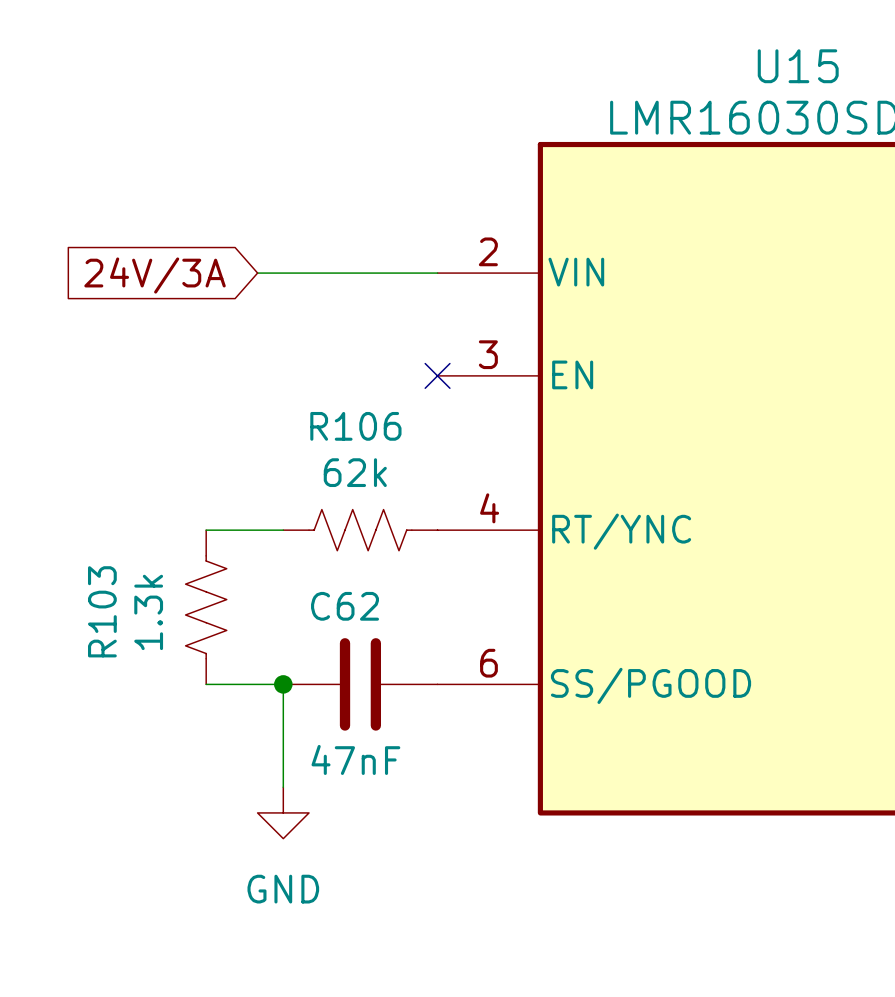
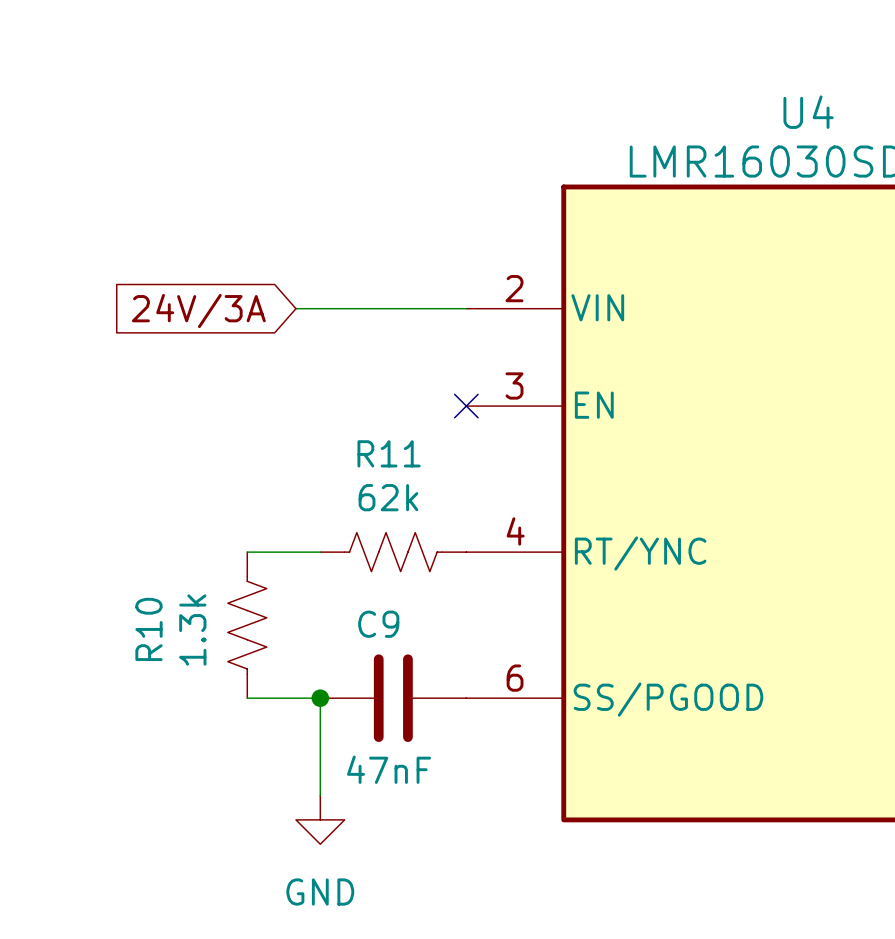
U15 name: U15 (798, 66) -> U4 (808, 112)
R106 name: R106 (355, 426) -> R11 (389, 453)
C62 name: C62 (345, 606) -> C9 (378, 624)
R103 name: R103 (102, 611) -> R10 (149, 629)

